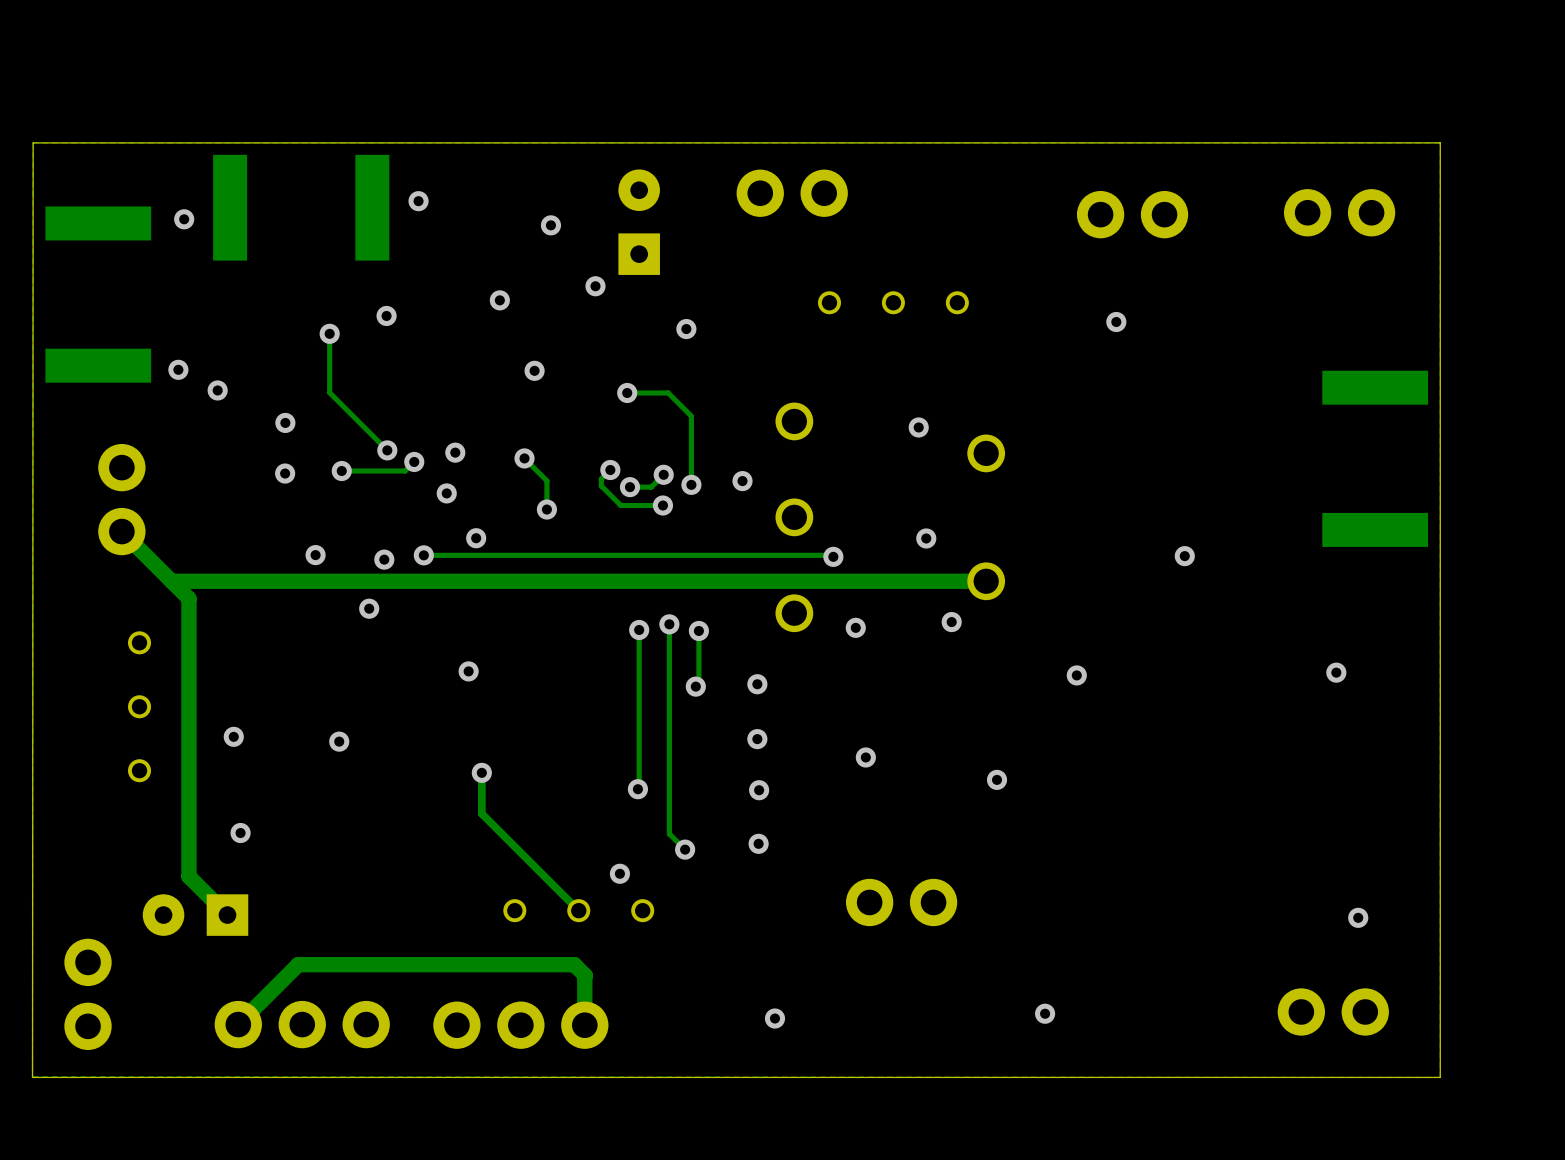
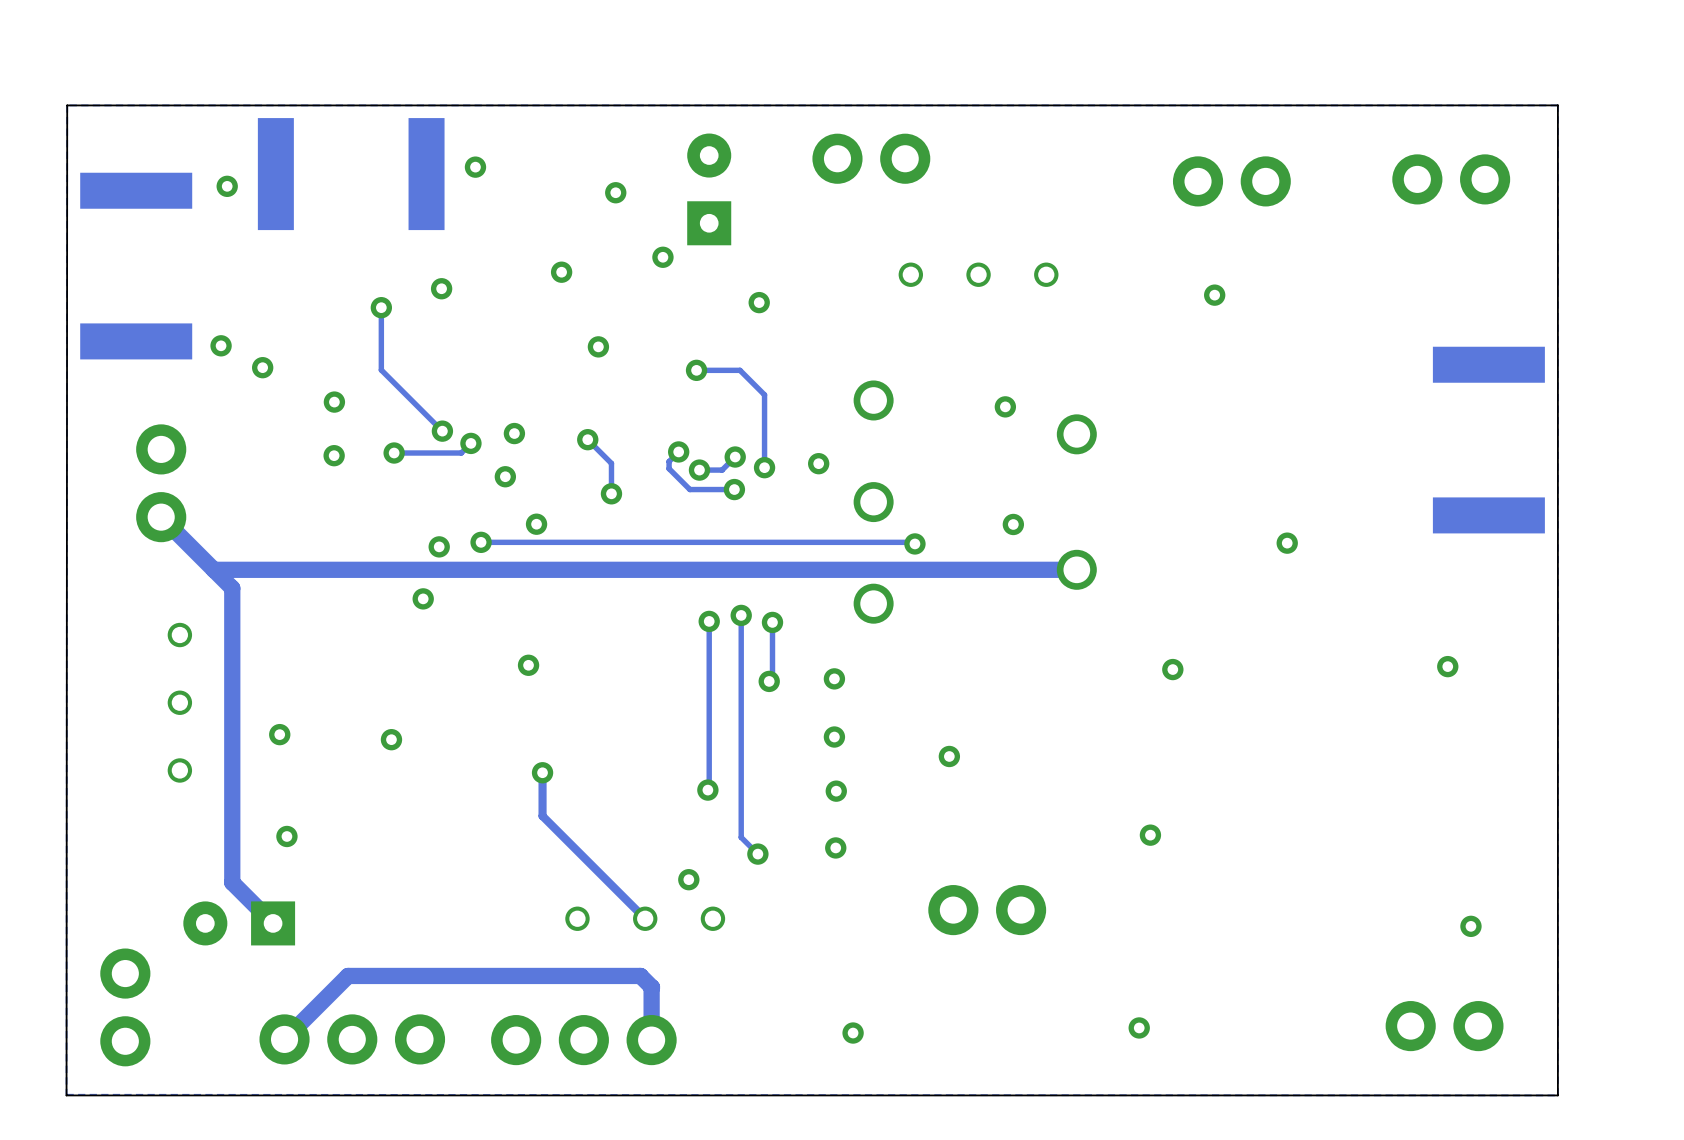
via: (315, 555) -> none
via: (951, 622) -> none
via: (855, 627) -> none
via position: (997, 779) -> (1150, 835)

